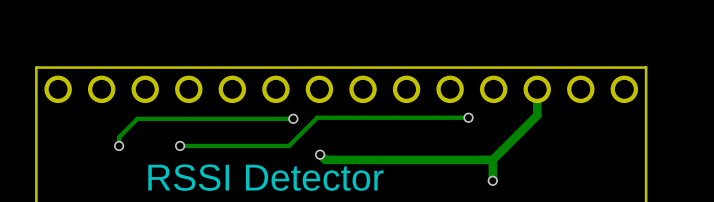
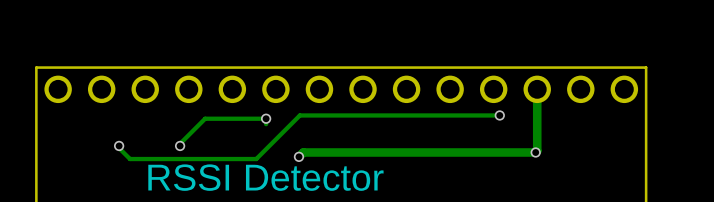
track: none -> (499, 115) (299, 115) (256, 159) (130, 159) (119, 148)
track: (537, 115) (492, 159) -> (537, 115) (535, 152) (303, 152) (298, 156)
track: (468, 117) (317, 117) (288, 145) (180, 145) -> none
via position: (468, 117) -> (499, 115)
via: none -> (266, 118)
track: (293, 118) (137, 118) (119, 137) (119, 145) -> none
via: (293, 118) -> none
track: none -> (266, 124) (266, 118) (205, 118) (177, 145)
via: none -> (535, 152)
track: (320, 154) (325, 159) (492, 159) -> none
via: (320, 154) -> none
via: none -> (298, 156)
track: (492, 159) (492, 180) -> none
via: (492, 180) -> none

